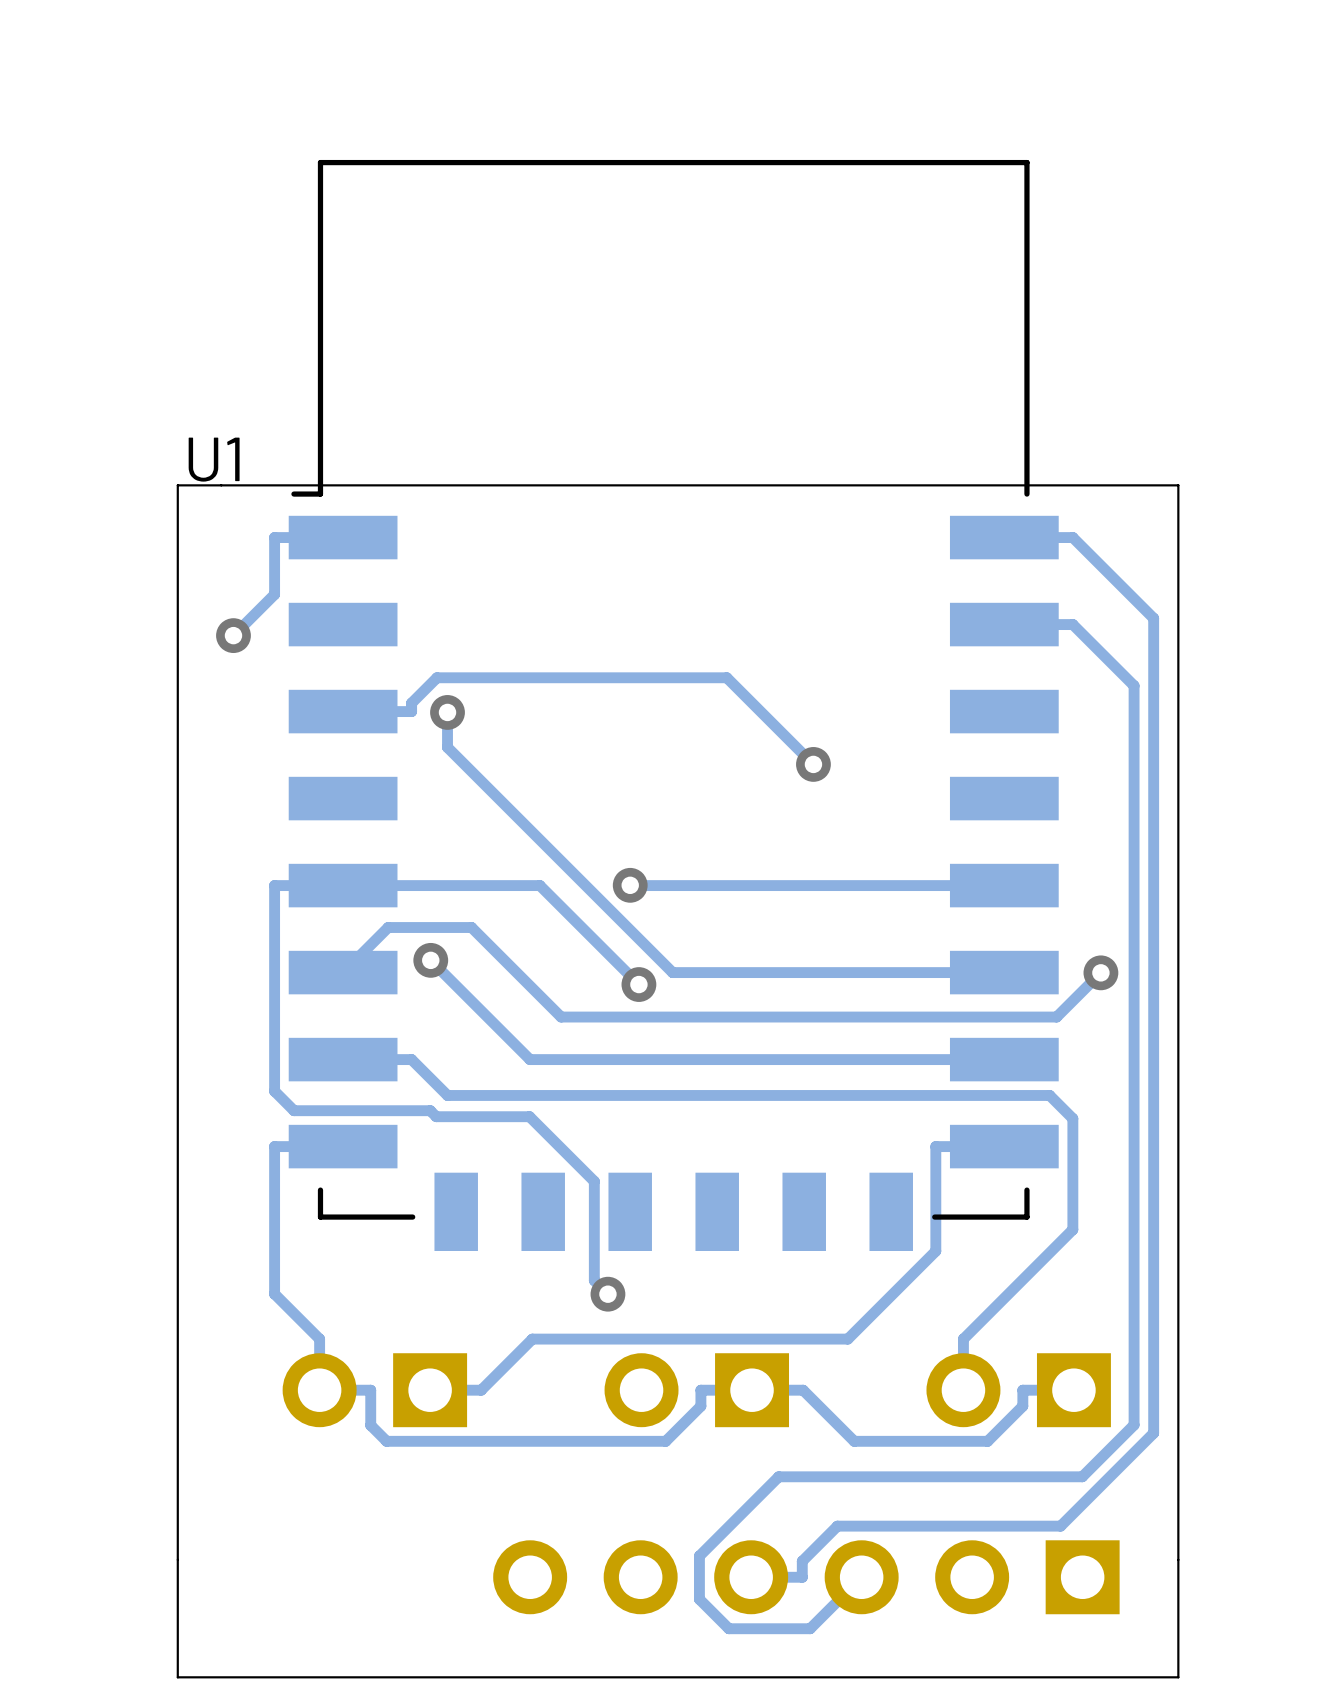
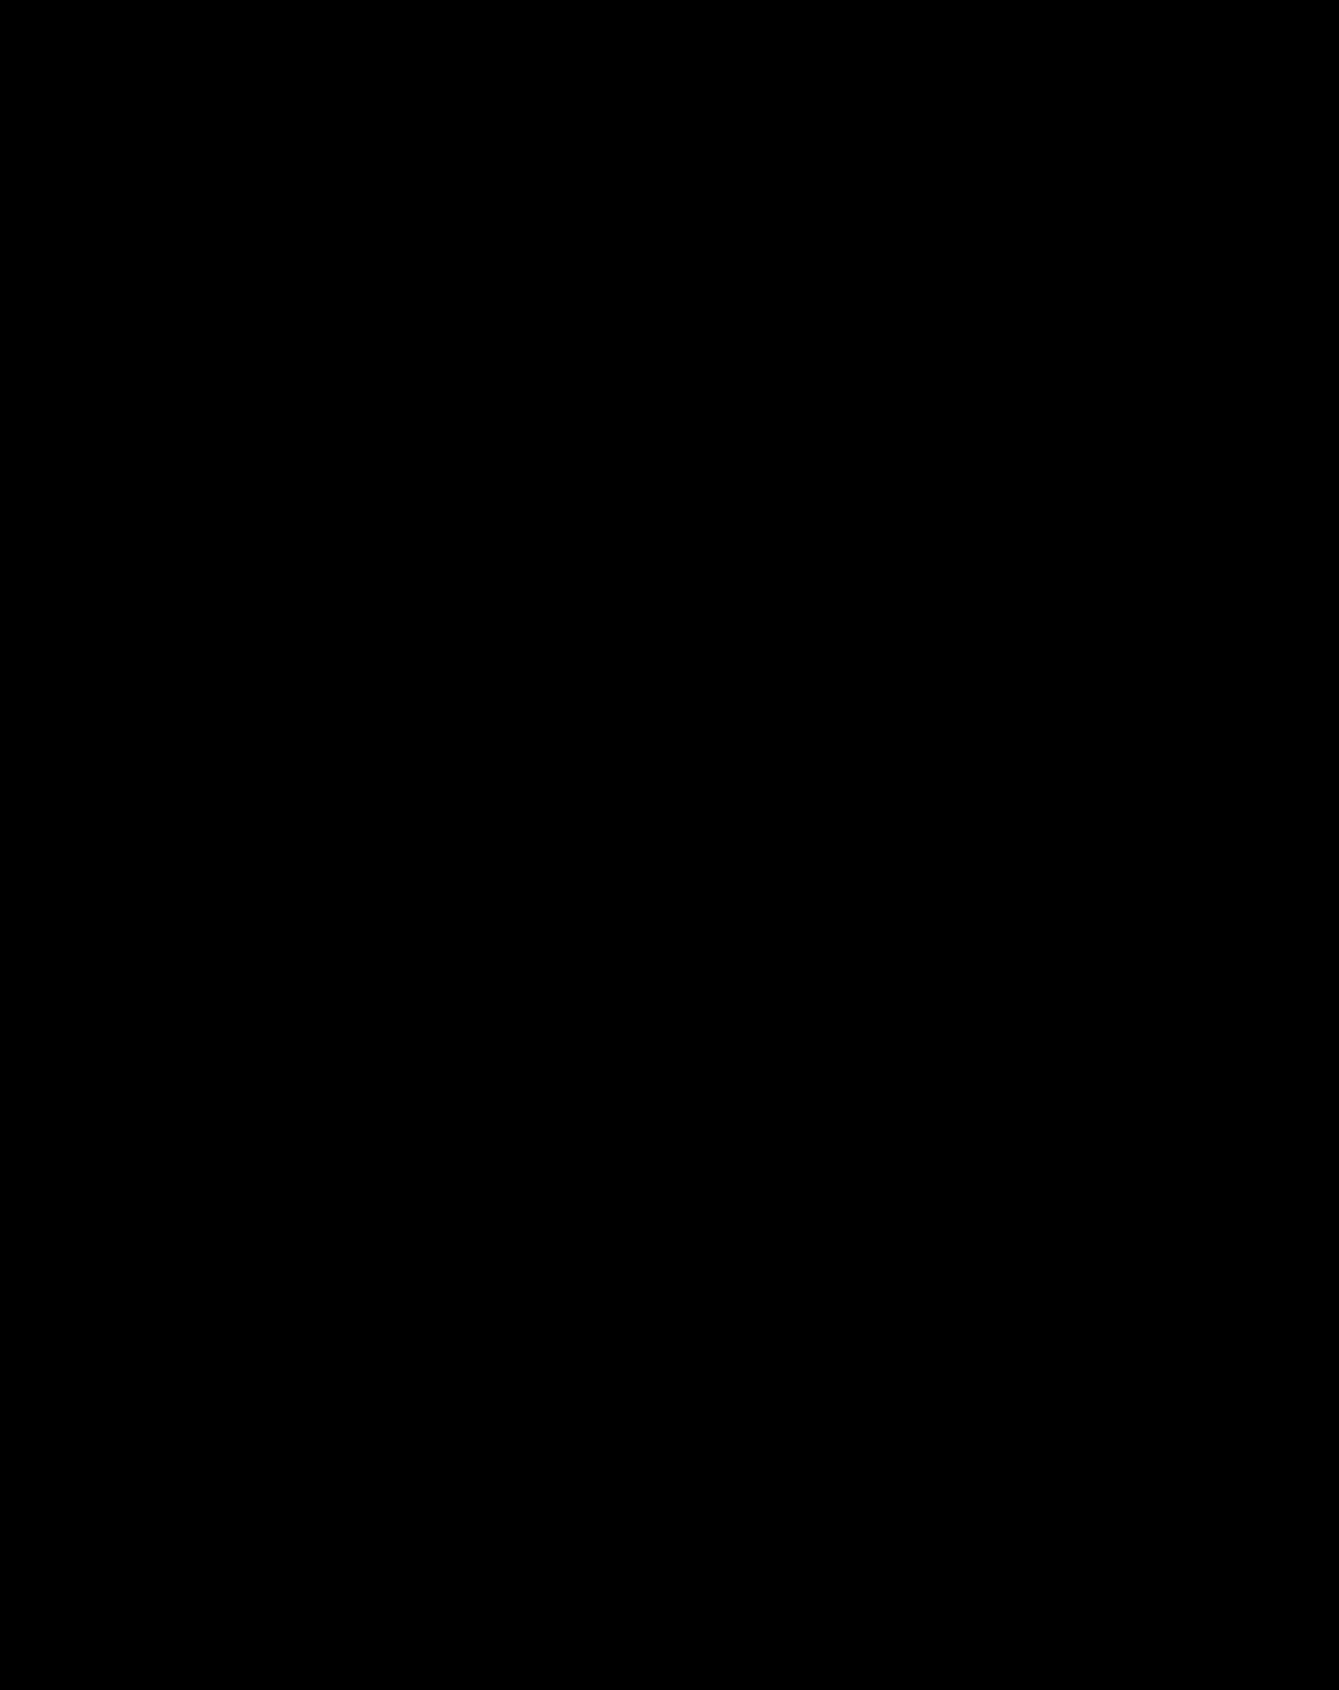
board edge: (1178, 485) (1178, 1677) (177, 1677) (177, 485) (1178, 485) -> none
track: (343, 537) (274, 537) (274, 594) (233, 635) -> none
track: (1004, 537) (1072, 537) (1153, 618) (1153, 1433) (1060, 1526) (837, 1526) (802, 1561) (802, 1577) (751, 1577) -> none
track: (1004, 624) (1072, 624) (1134, 685) (1134, 1425) (1082, 1476) (778, 1476) (699, 1556) (699, 1599) (728, 1628) (810, 1628) (861, 1577) -> none
via: (233, 635) -> none
U1: (673, 705) -> none
track: (343, 711) (411, 711) (411, 703) (436, 677) (726, 677) (813, 764) -> none
track: (447, 712) (447, 747) (672, 972) (1004, 972) -> none
via: (447, 712) -> none
via: (813, 764) -> none
via: (630, 885) -> none
track: (1004, 885) (630, 885) -> none
track: (430, 960) (529, 1059) (1004, 1059) -> none
via: (430, 960) -> none
track: (343, 972) (388, 927) (471, 927) (561, 1017) (1056, 1017) (1100, 972) -> none
via: (1100, 972) -> none
track: (638, 984) (539, 885) (274, 885) (274, 1091) (294, 1110) (430, 1110) (436, 1116) (529, 1116) (594, 1181) (594, 1280) (607, 1294) -> none
via: (638, 984) -> none
track: (343, 1059) (411, 1059) (447, 1095) (1049, 1095) (1072, 1118) (1072, 1229) (963, 1339) (963, 1390) -> none
track: (343, 1146) (274, 1146) (274, 1294) (319, 1339) (319, 1390) (370, 1390) (370, 1425) (386, 1441) (665, 1441) (700, 1406) (700, 1390) (803, 1390) (854, 1441) (987, 1441) (1022, 1406) (1022, 1390) (1073, 1390) -> none
track: (1004, 1146) (935, 1146) (935, 1251) (847, 1339) (532, 1339) (481, 1390) (430, 1390) -> none
via: (607, 1294) -> none
part: (374, 1390) -> none
part: (696, 1390) -> none
part: (1018, 1390) -> none
part: (806, 1577) -> none

